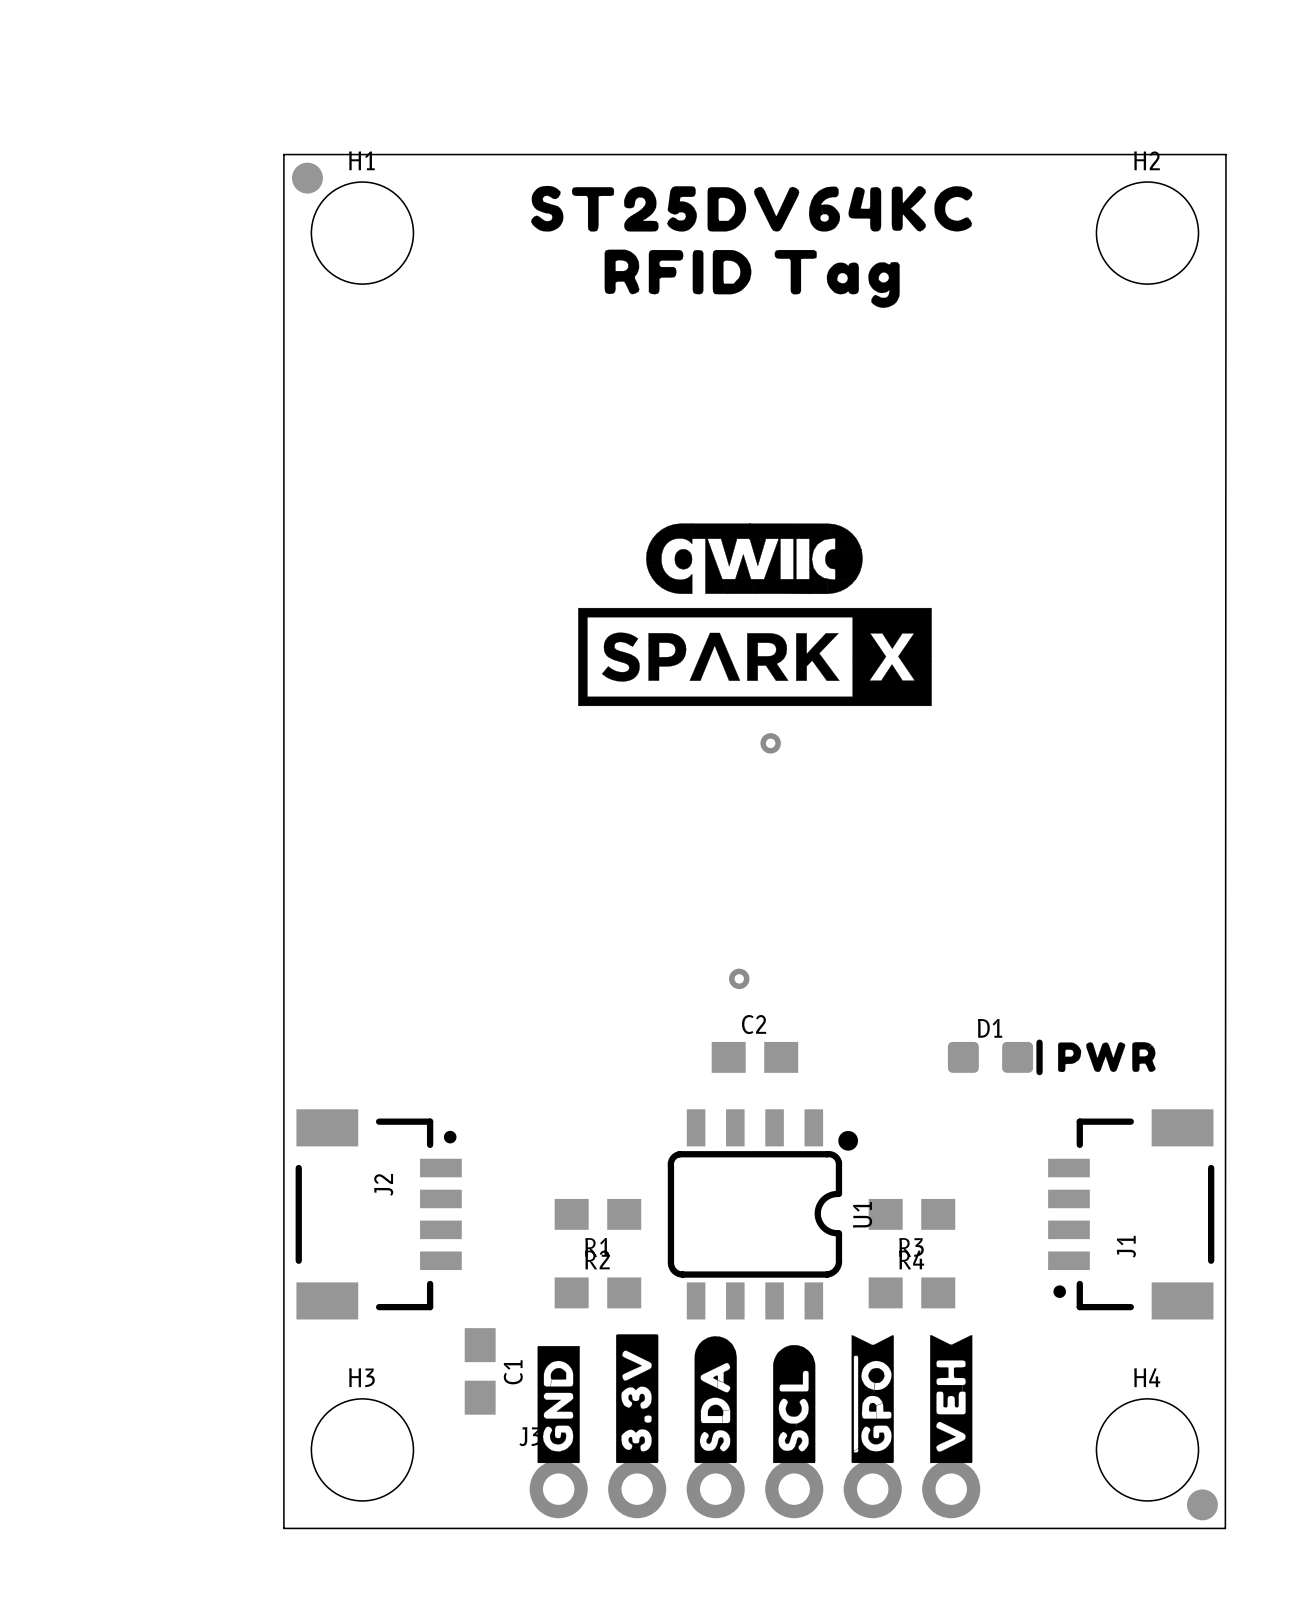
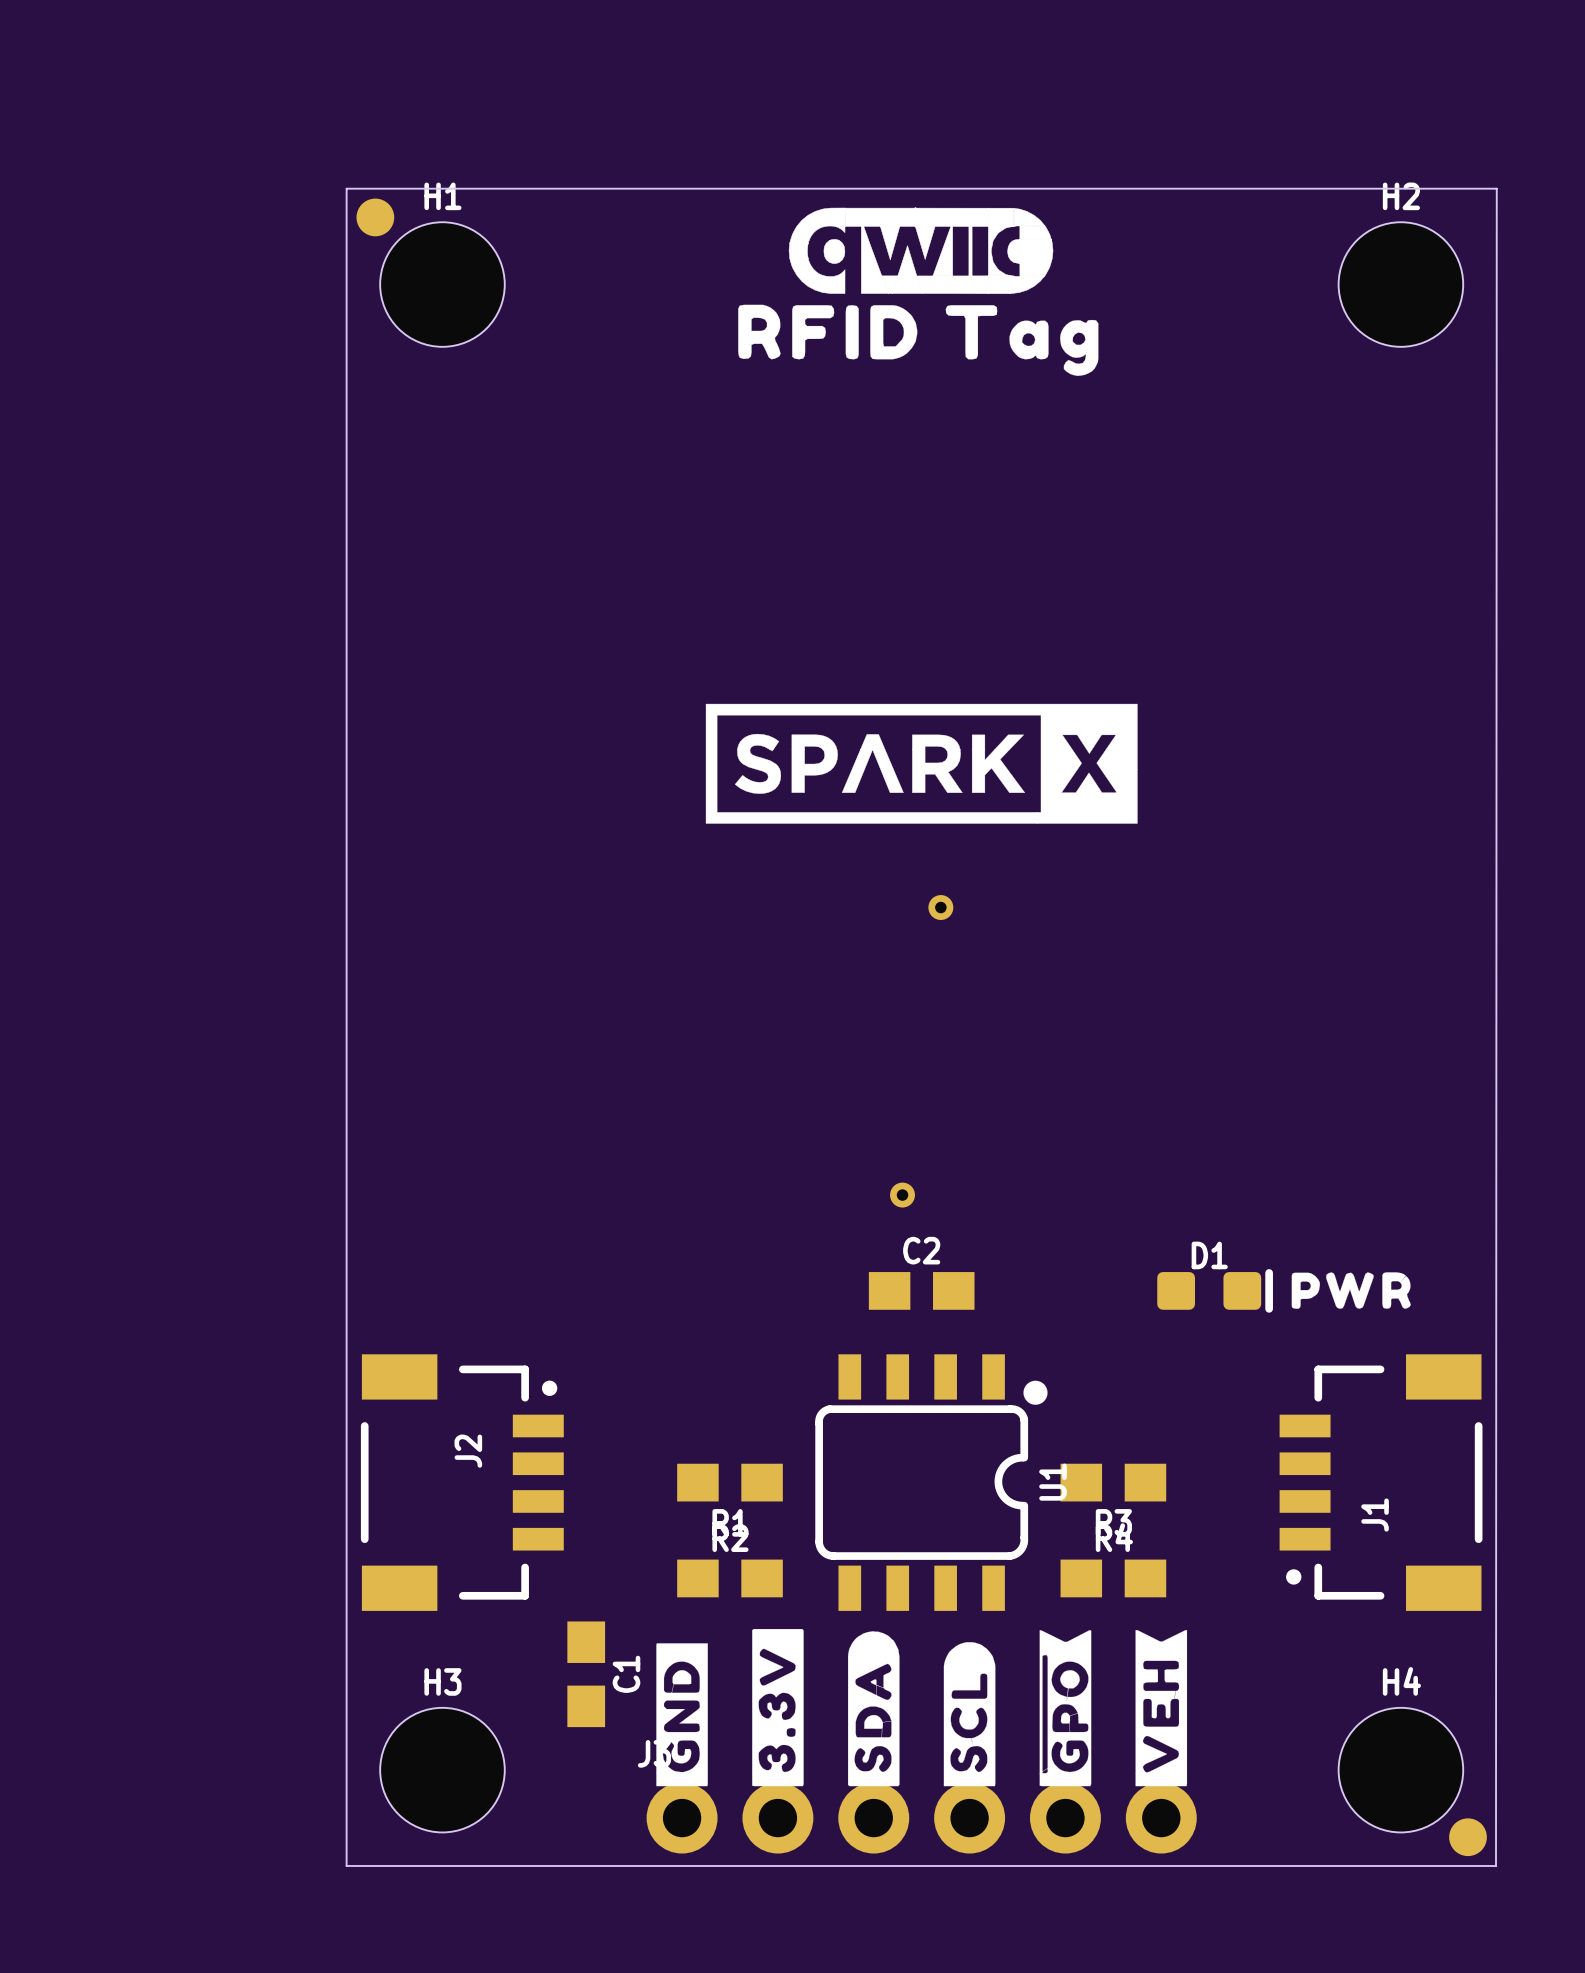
drawing: [531, 185, 973, 232] -> none
drawing position: (754, 558) -> (921, 250)
drawing position: (754, 657) -> (921, 763)

